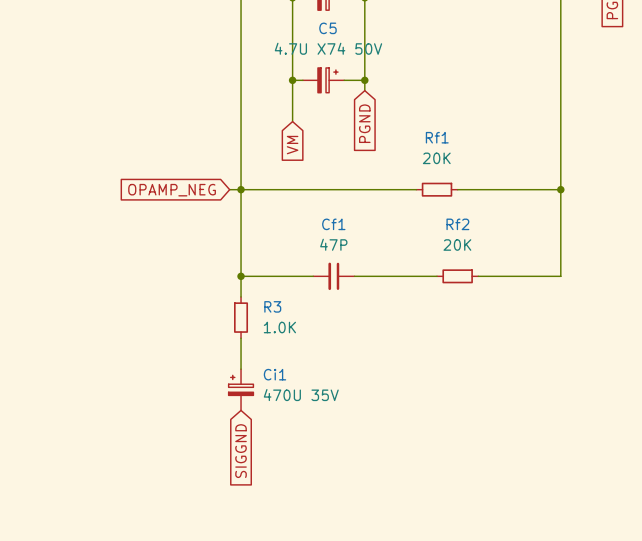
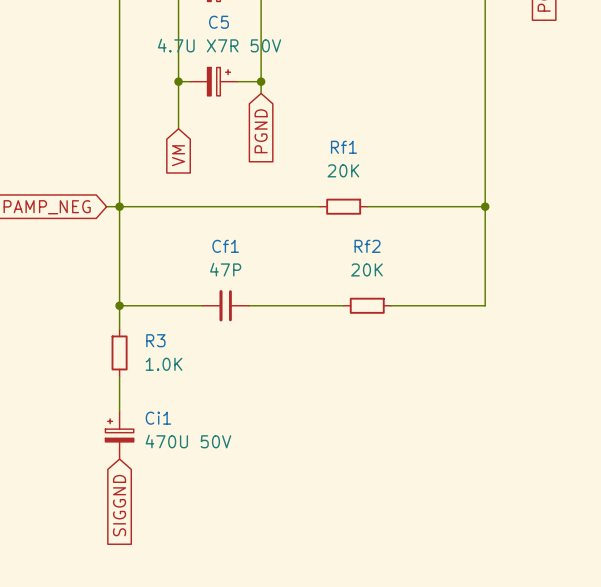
C5 value: 4.7U X74 50V (328, 48) -> 4.7U X7R 50V (219, 45)
Ci1 value: 470U 35V (301, 395) -> 470U 50V (188, 441)

